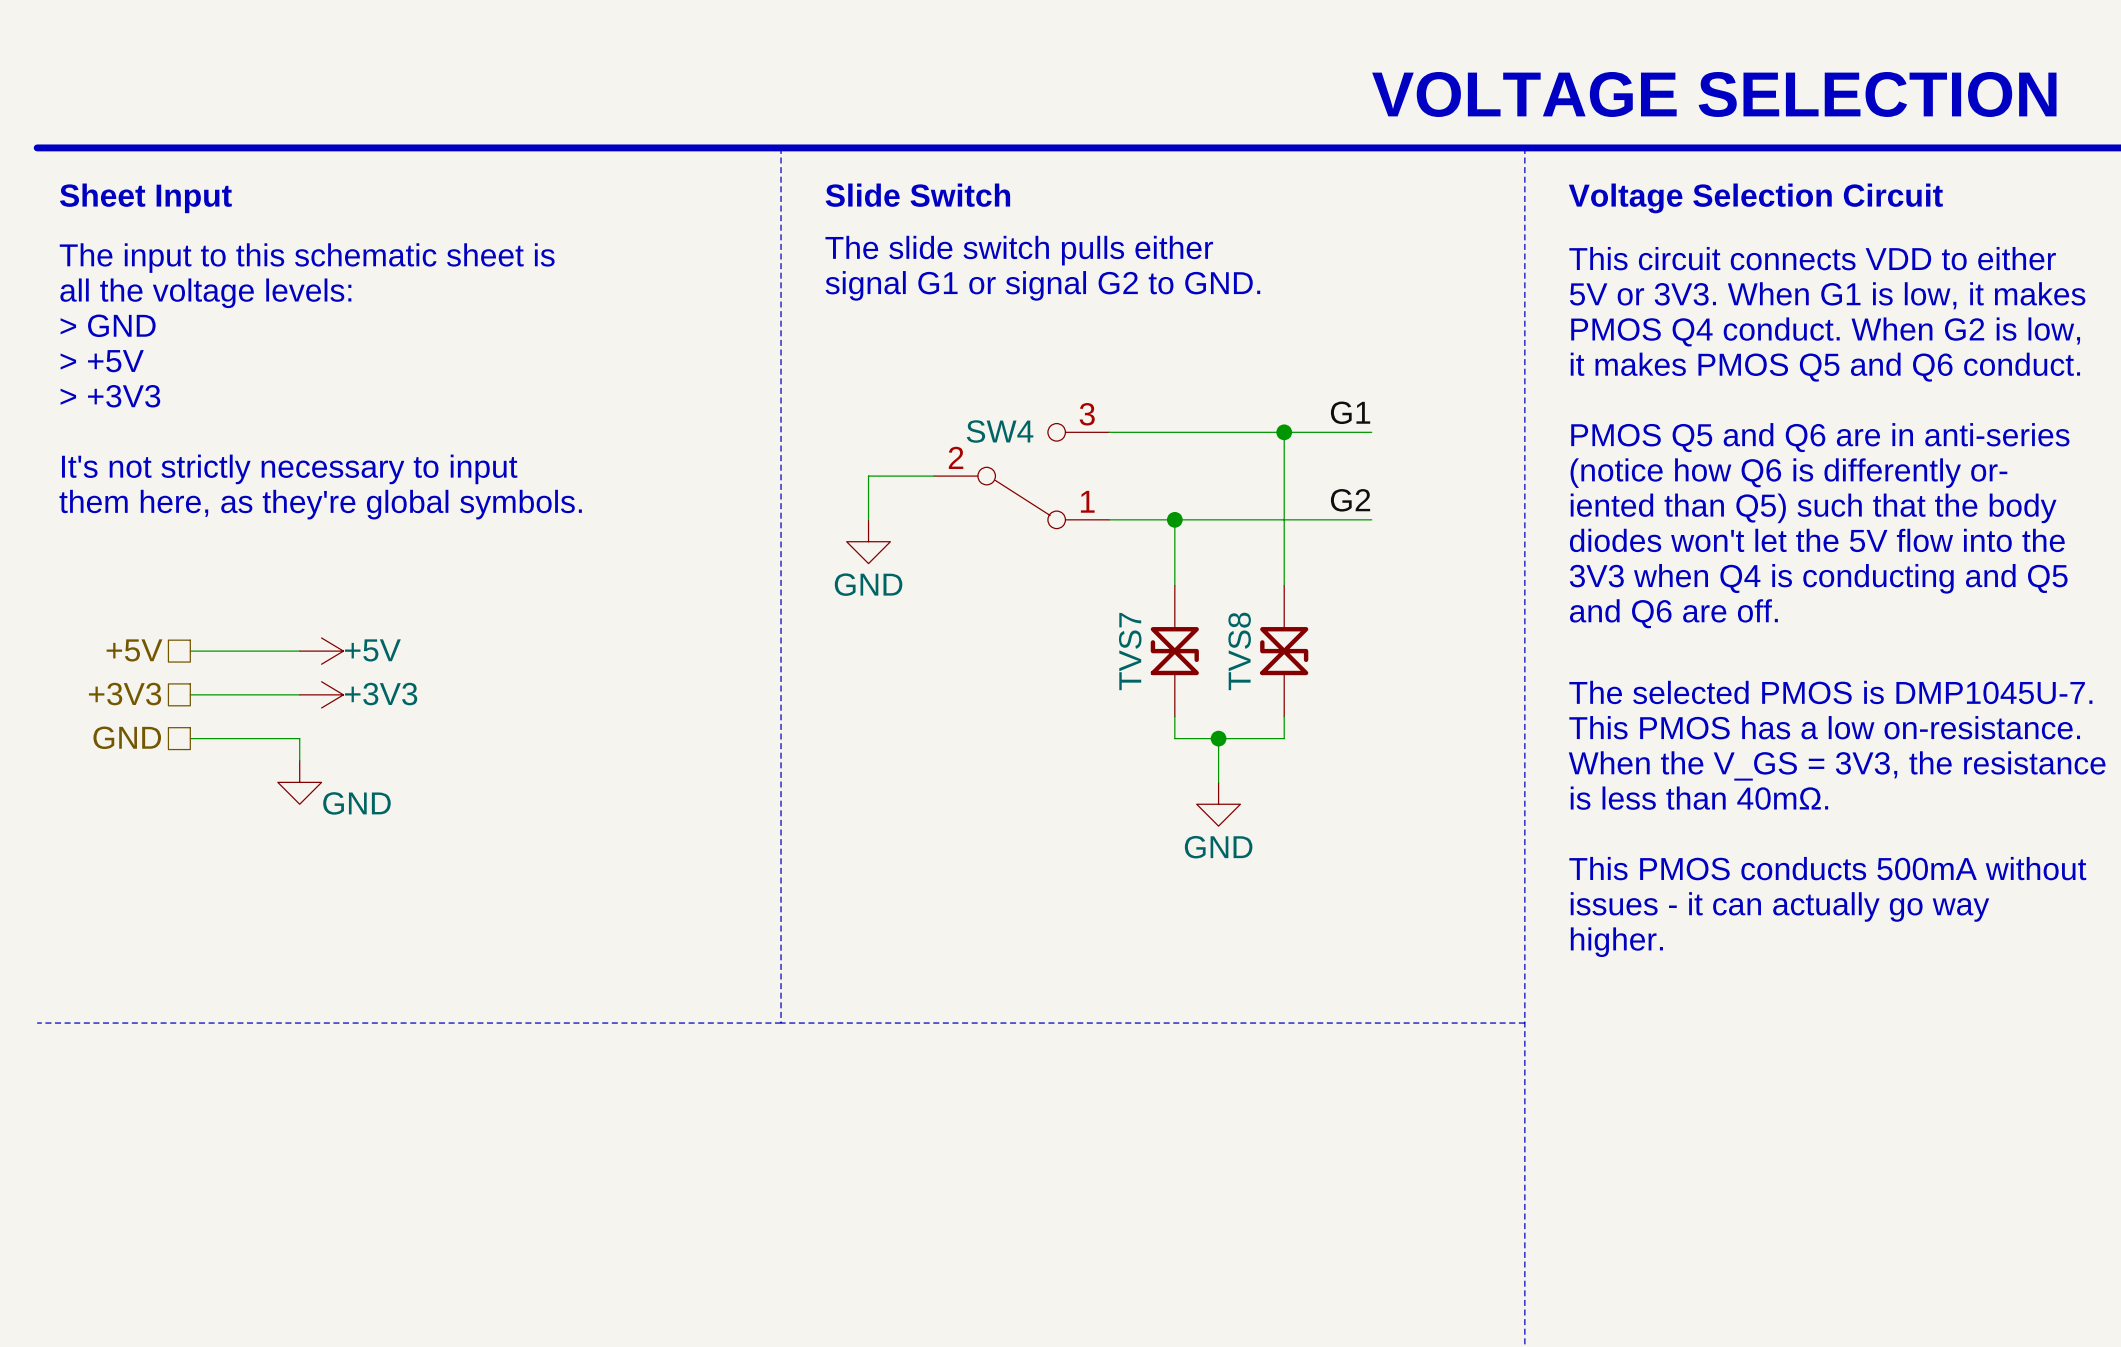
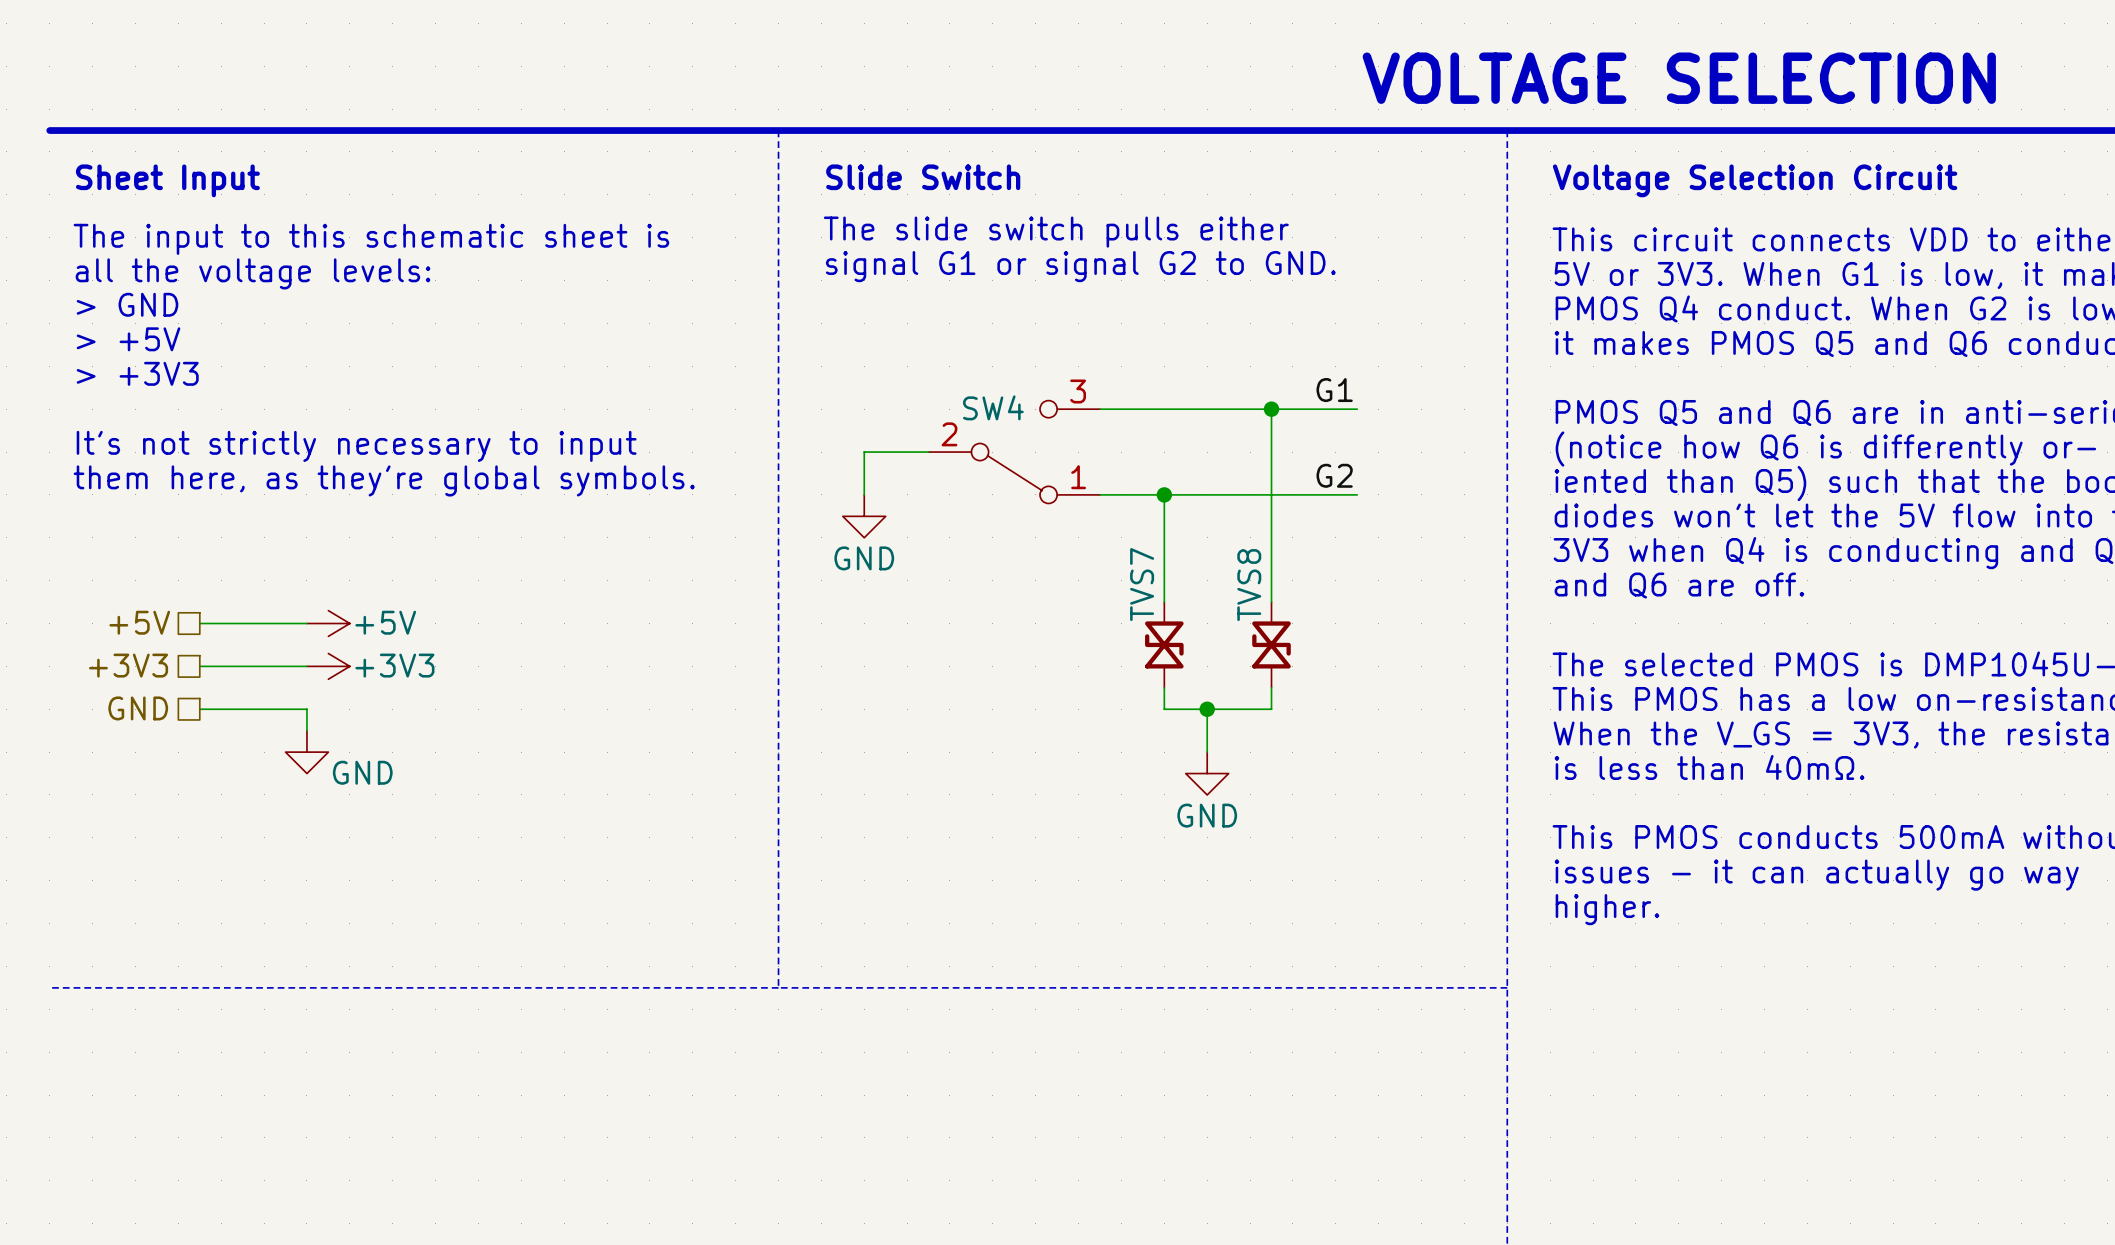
TVS7 symbol: [1150, 585, 1199, 717] -> [1145, 602, 1184, 688]
TVS8 symbol: [1260, 585, 1309, 717] -> [1252, 602, 1291, 688]
TVS7 name position: TVS7 (1130, 651) -> TVS7 (1142, 584)
TVS8 name position: TVS8 (1239, 651) -> TVS8 (1249, 585)

